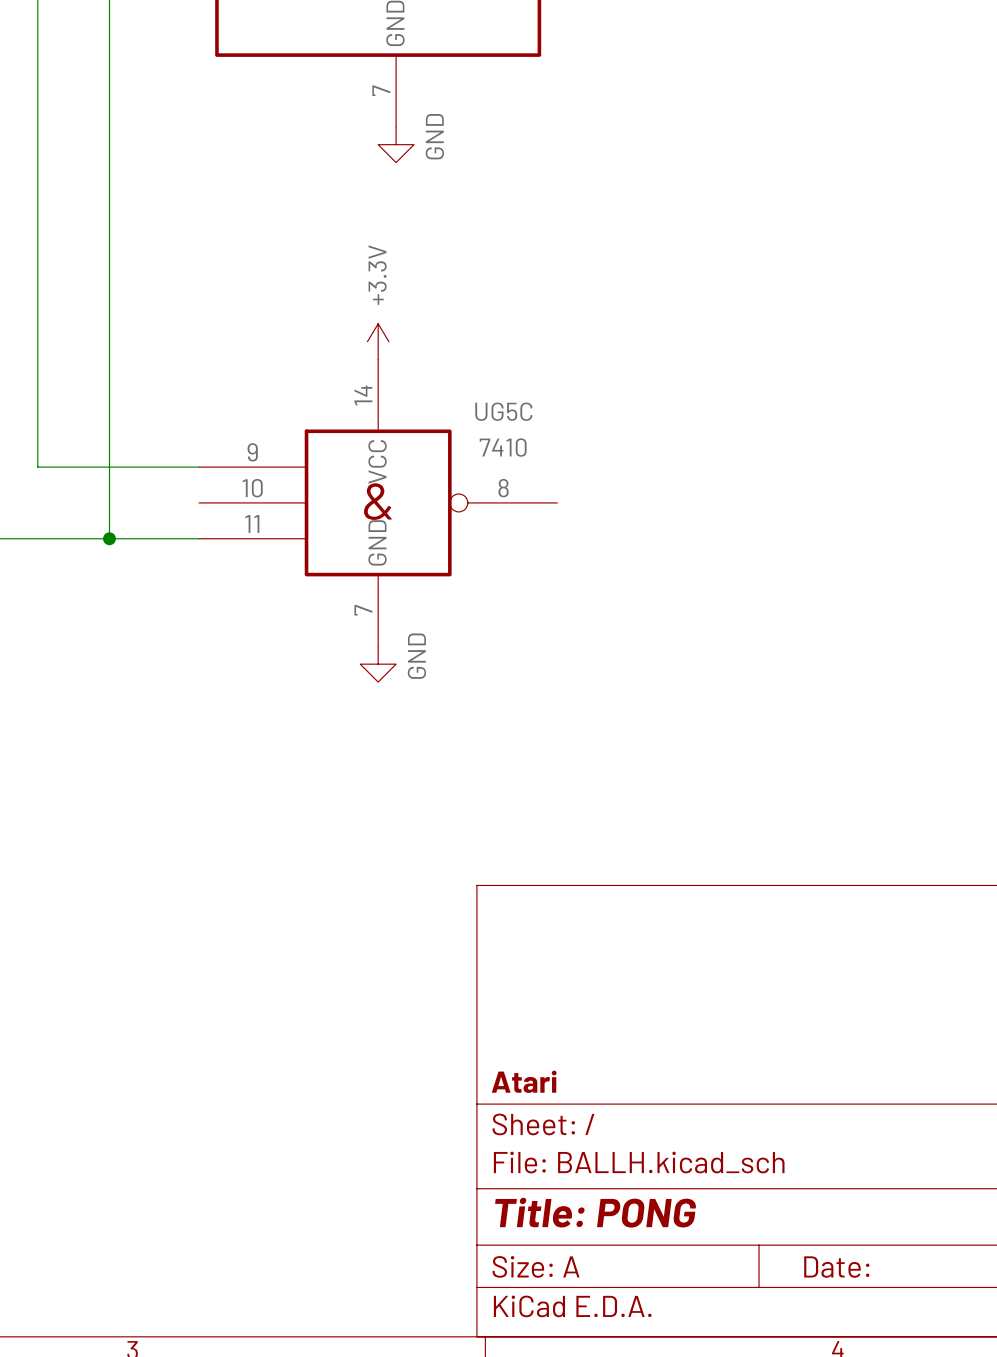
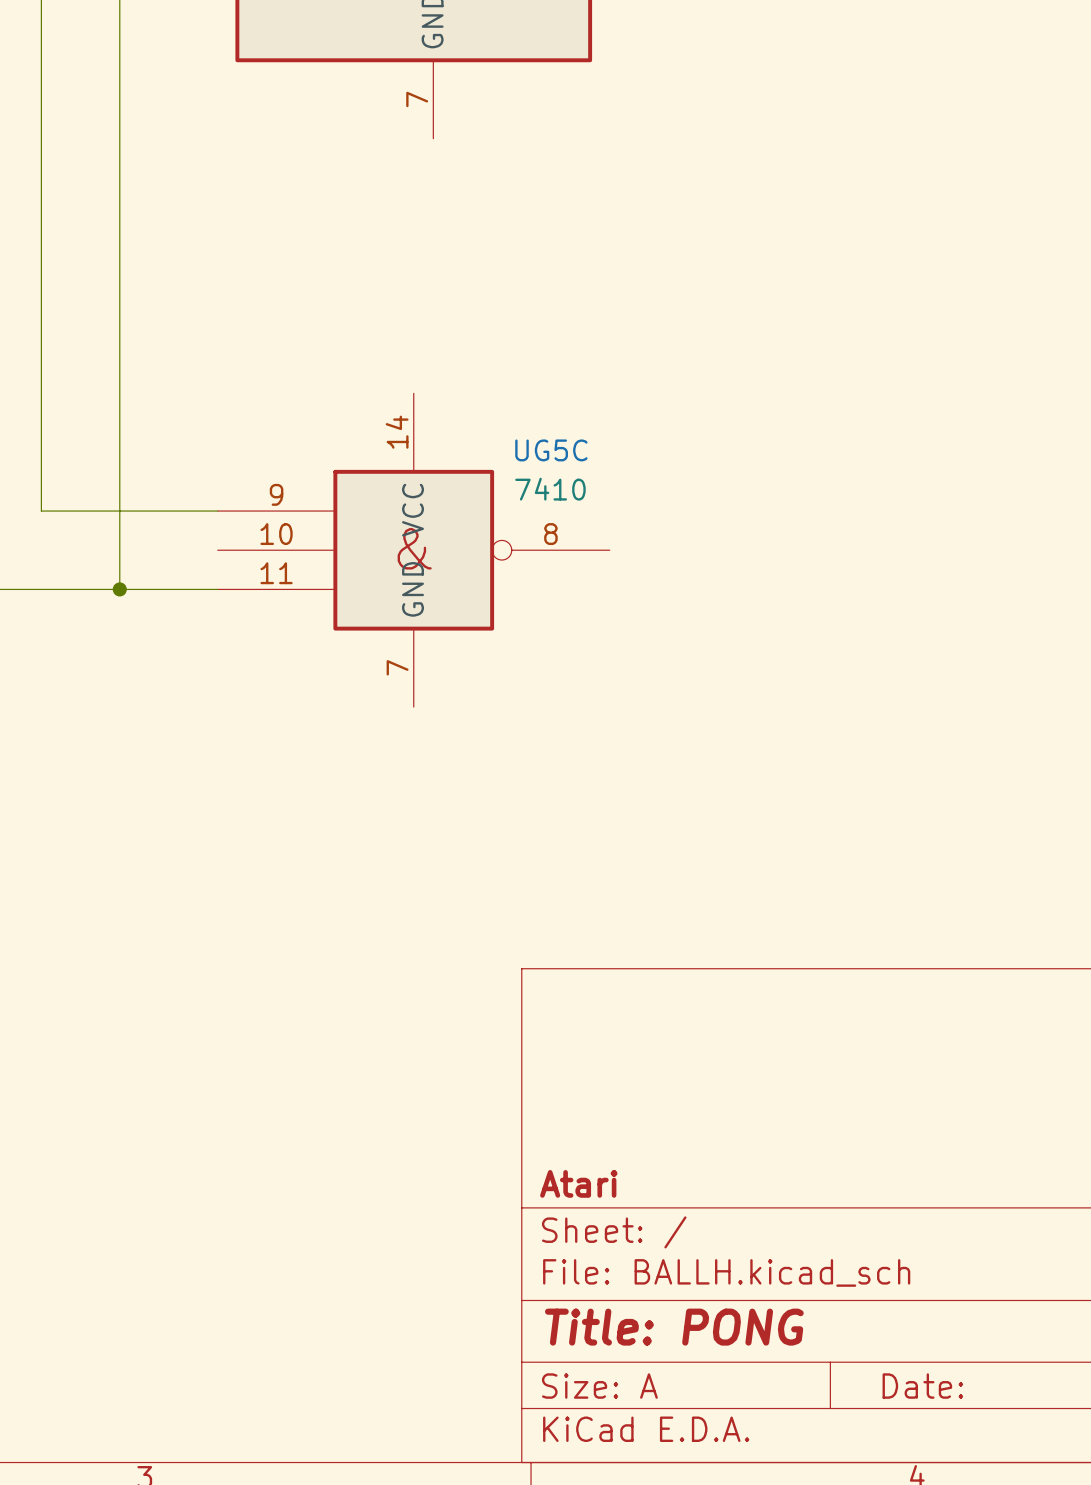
power symbol: GND (396, 144) -> none
power symbol: +3.3V (378, 341) -> none
power symbol: GND (378, 664) -> none

